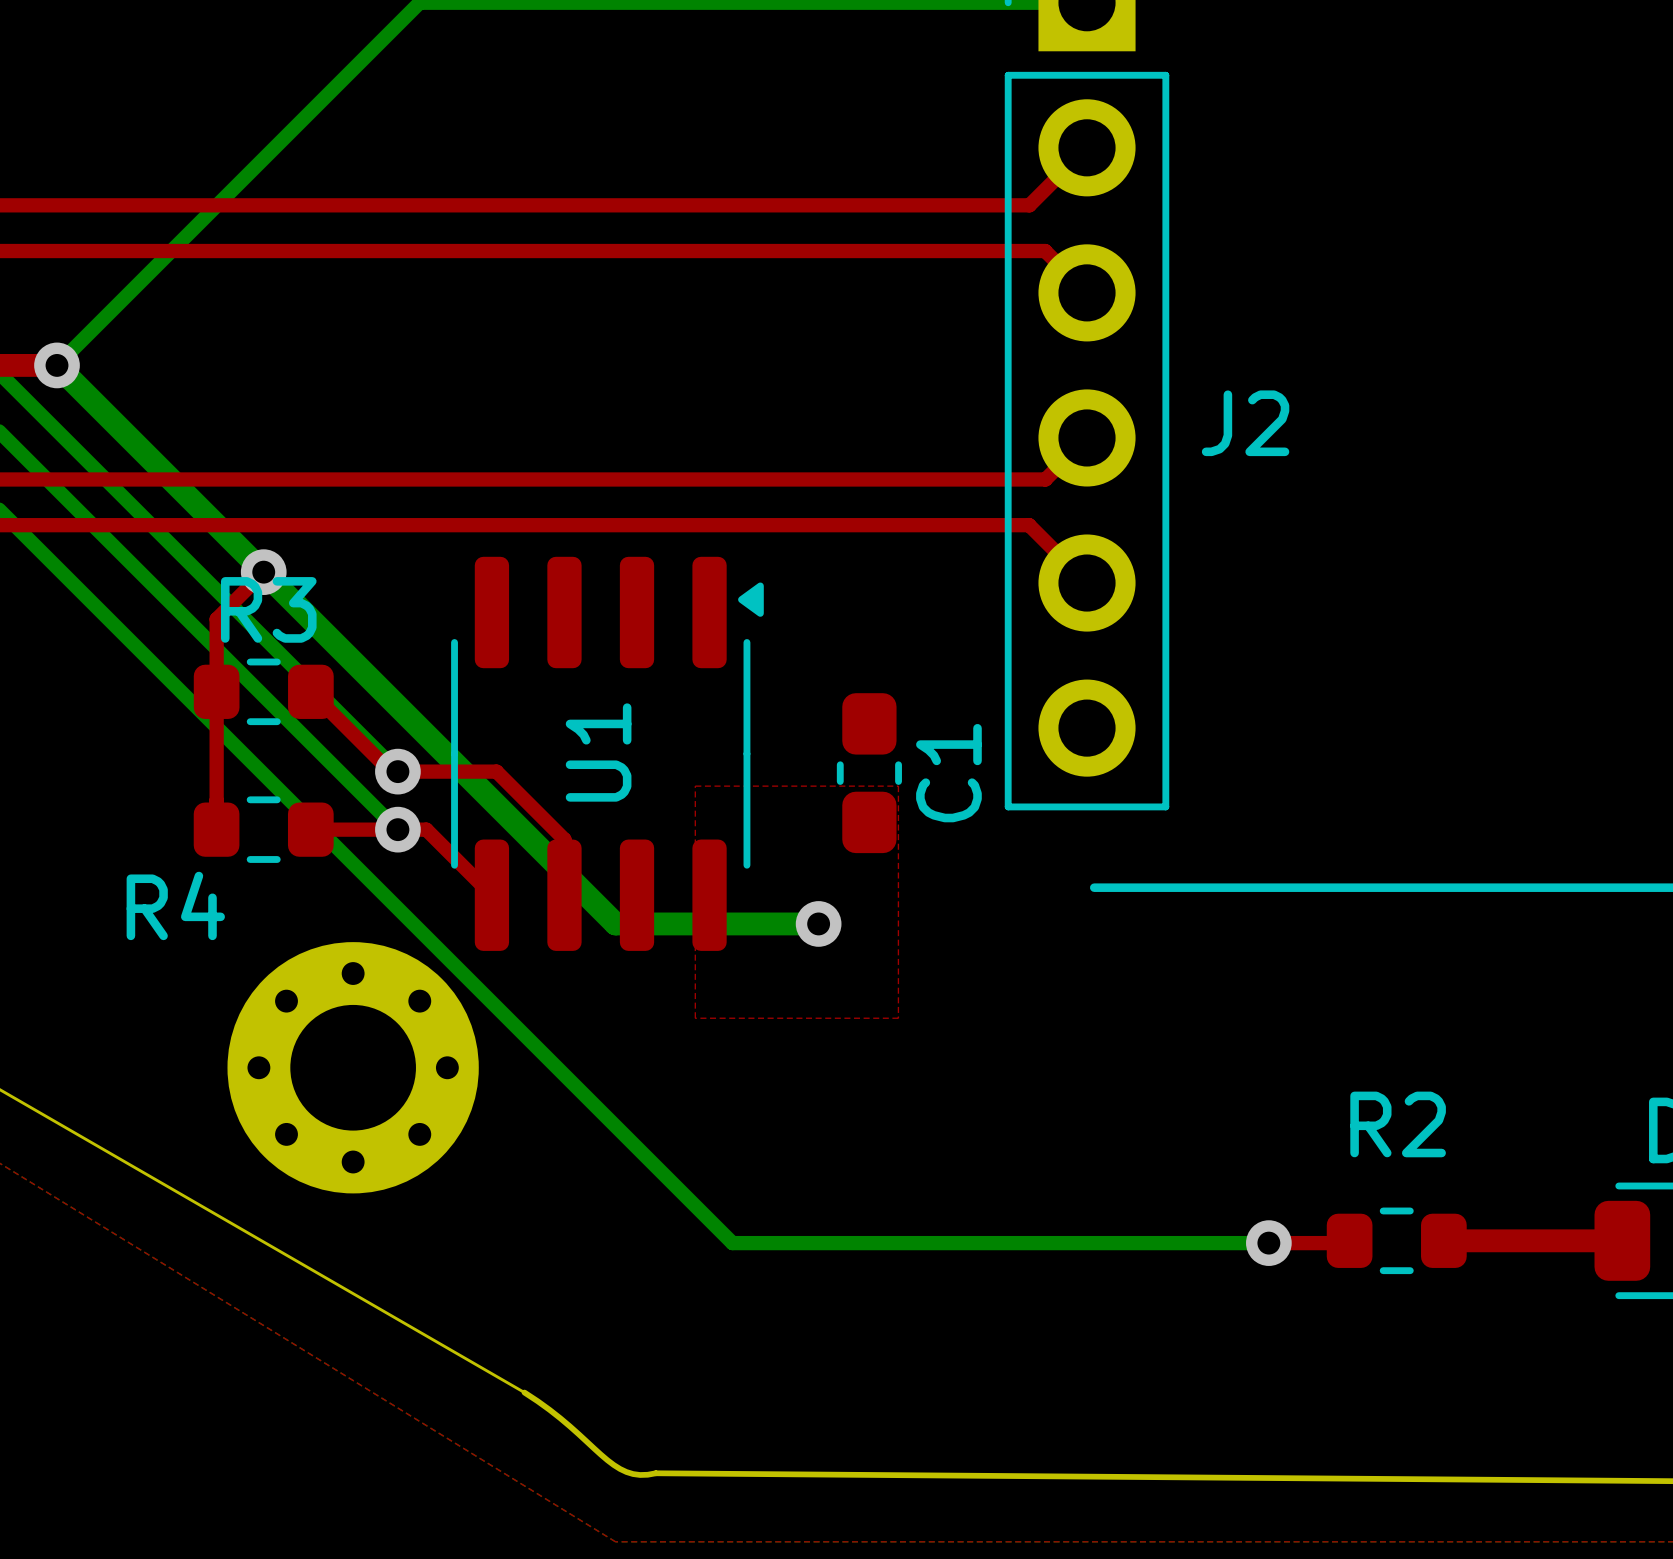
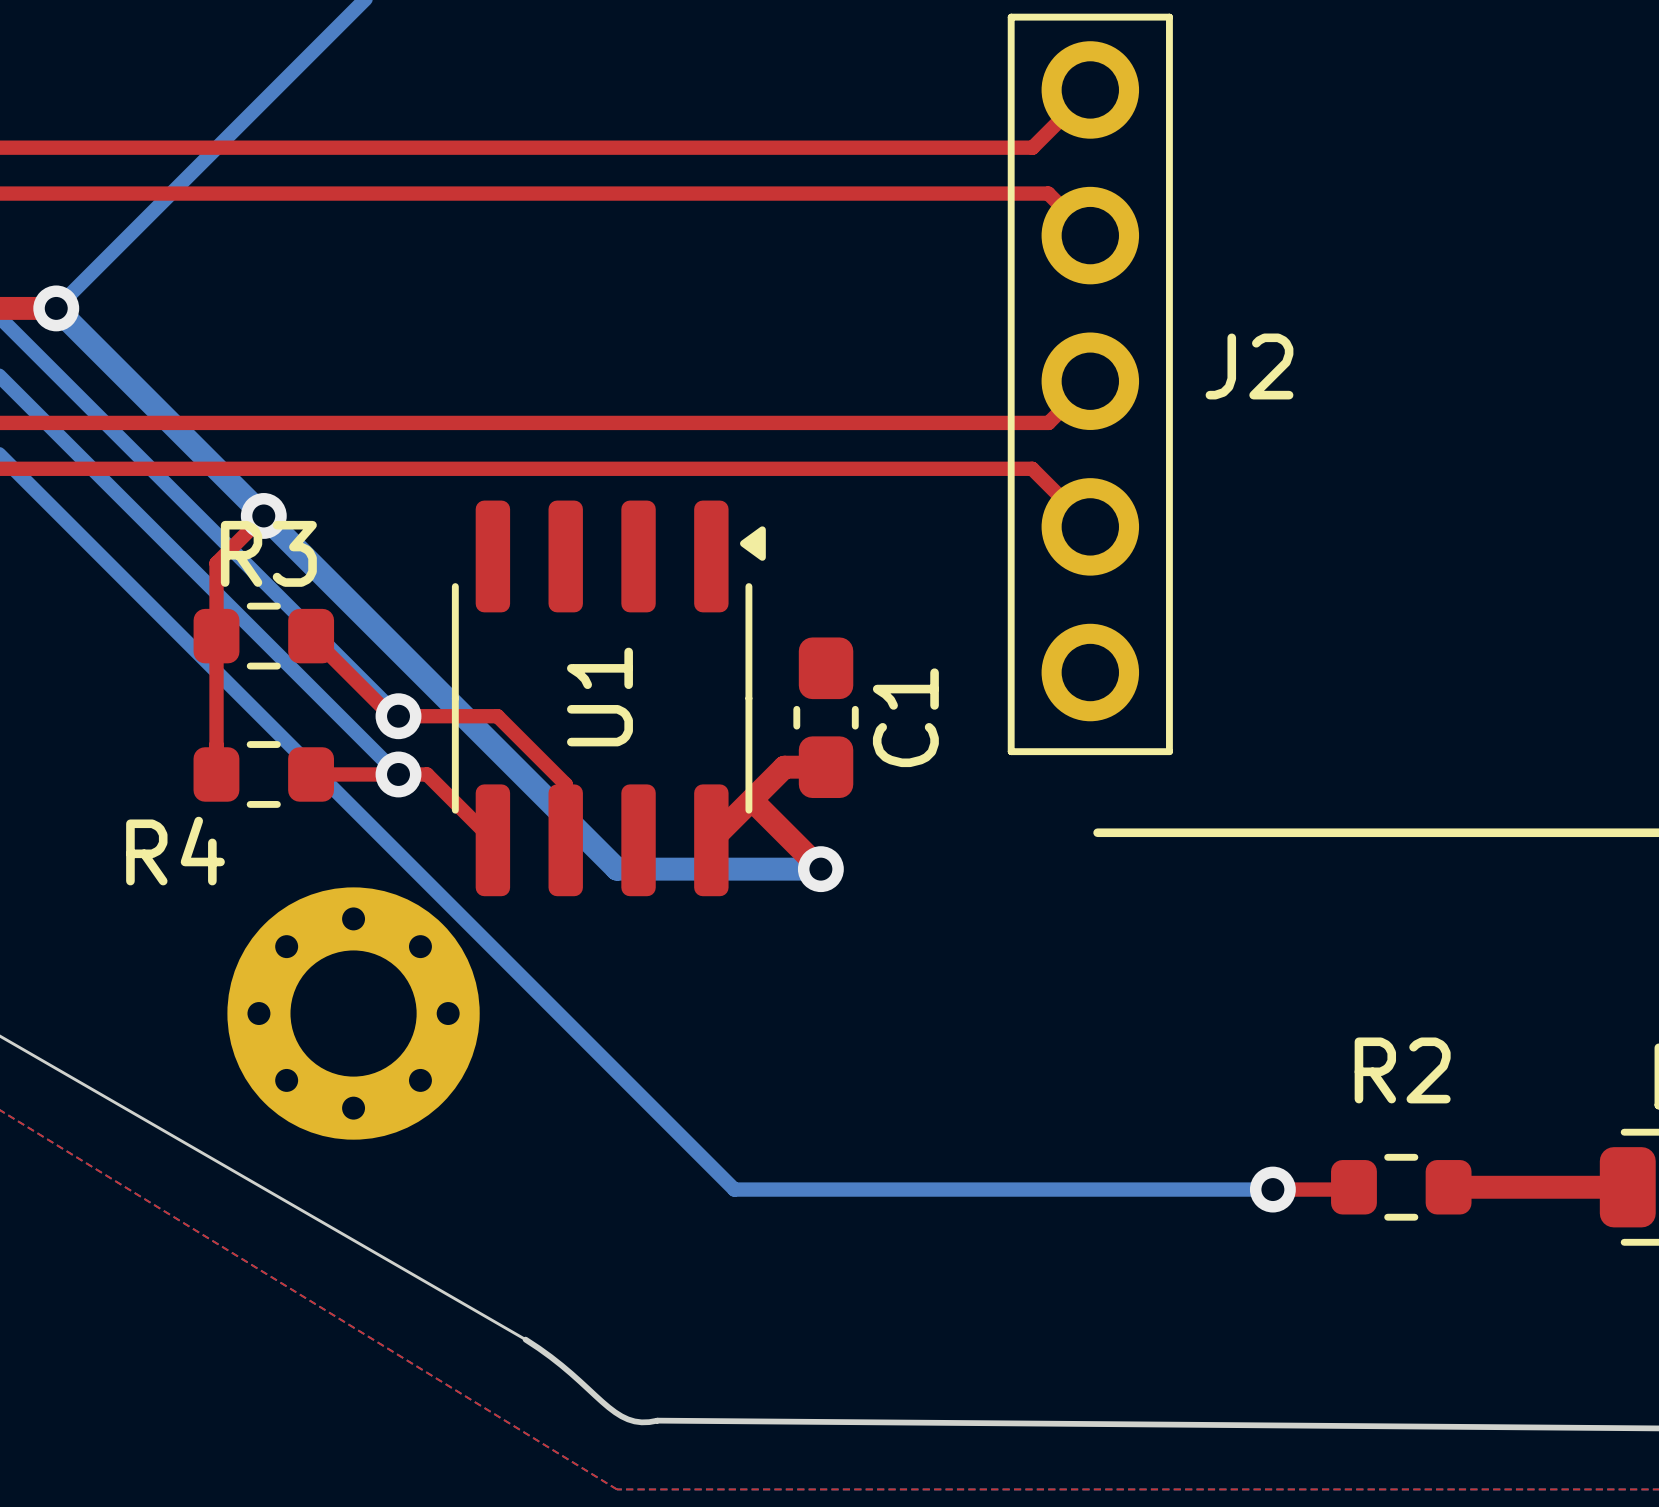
C1 position: (869, 773) -> (826, 717)
top zone outline: (695, 786) (695, 1018) (898, 1018) (898, 786) (695, 786) -> none
top track: none -> (826, 767) (784, 767) (711, 840)
top track: none -> (755, 796) (755, 803) (820, 869)

